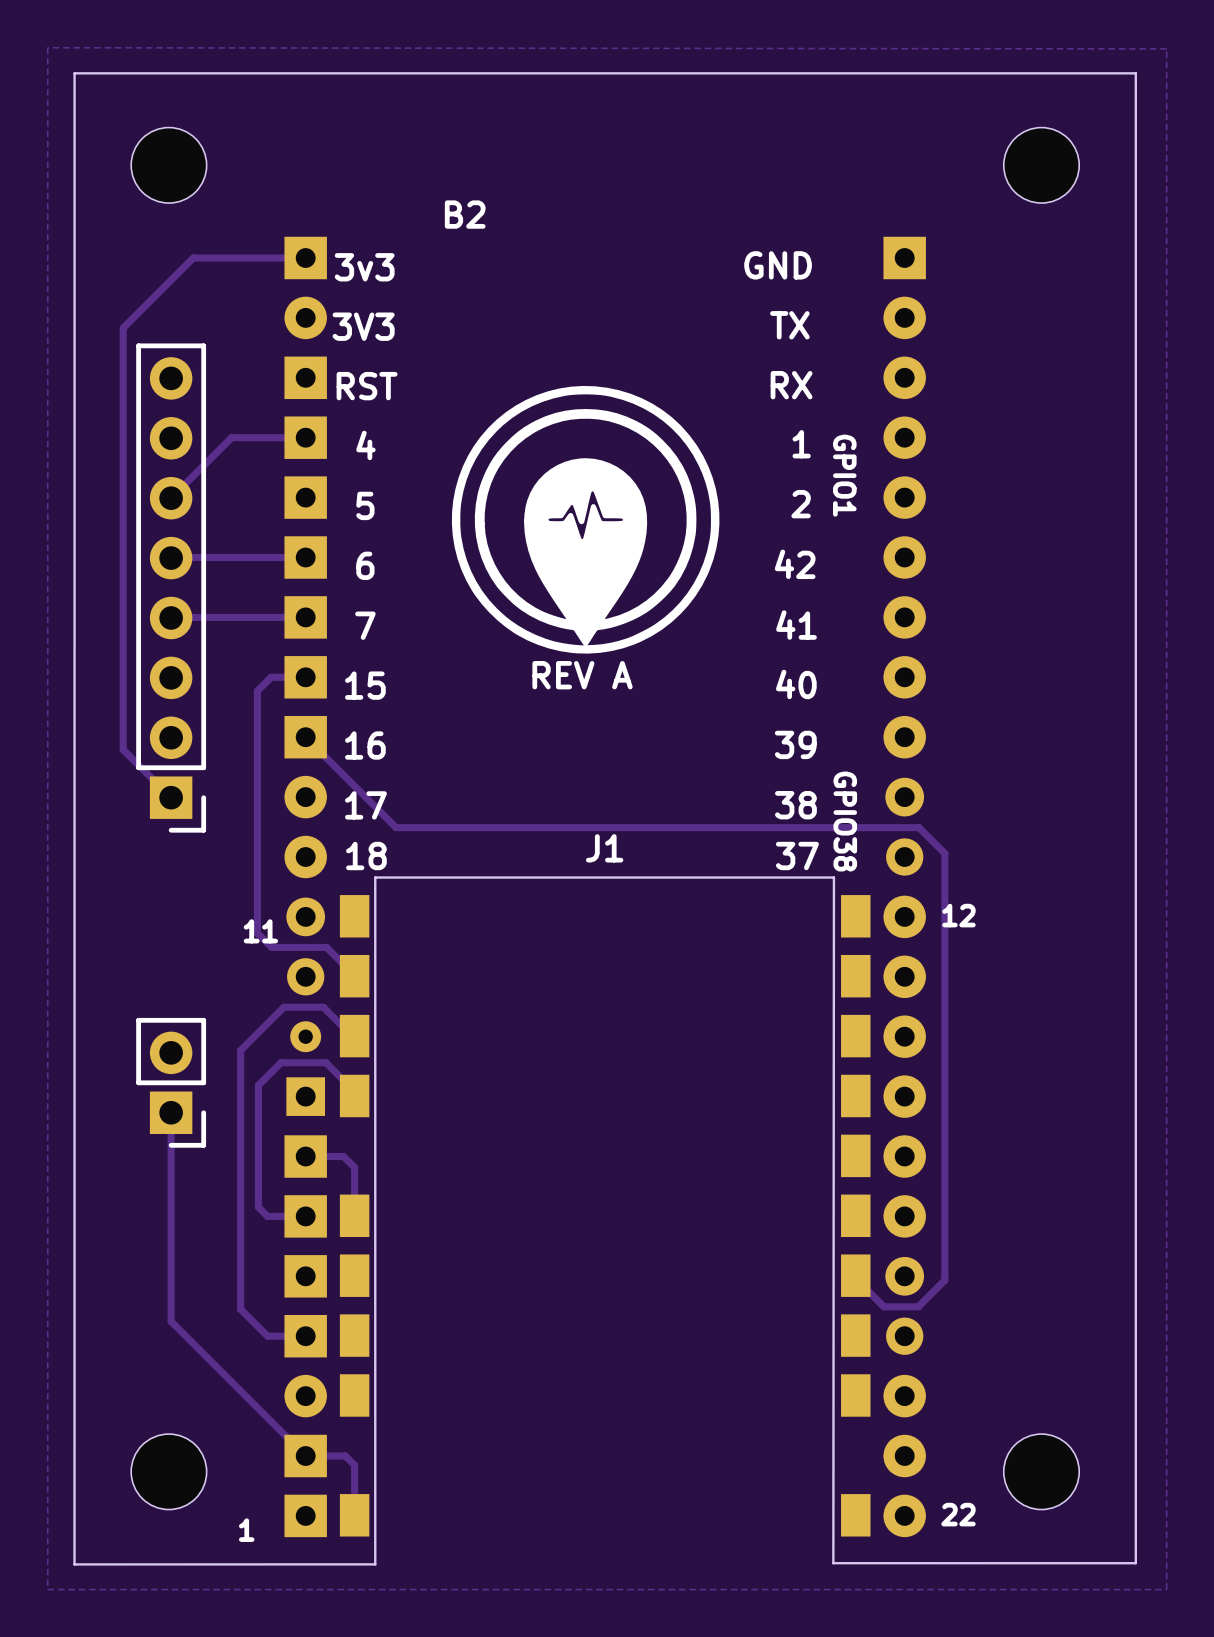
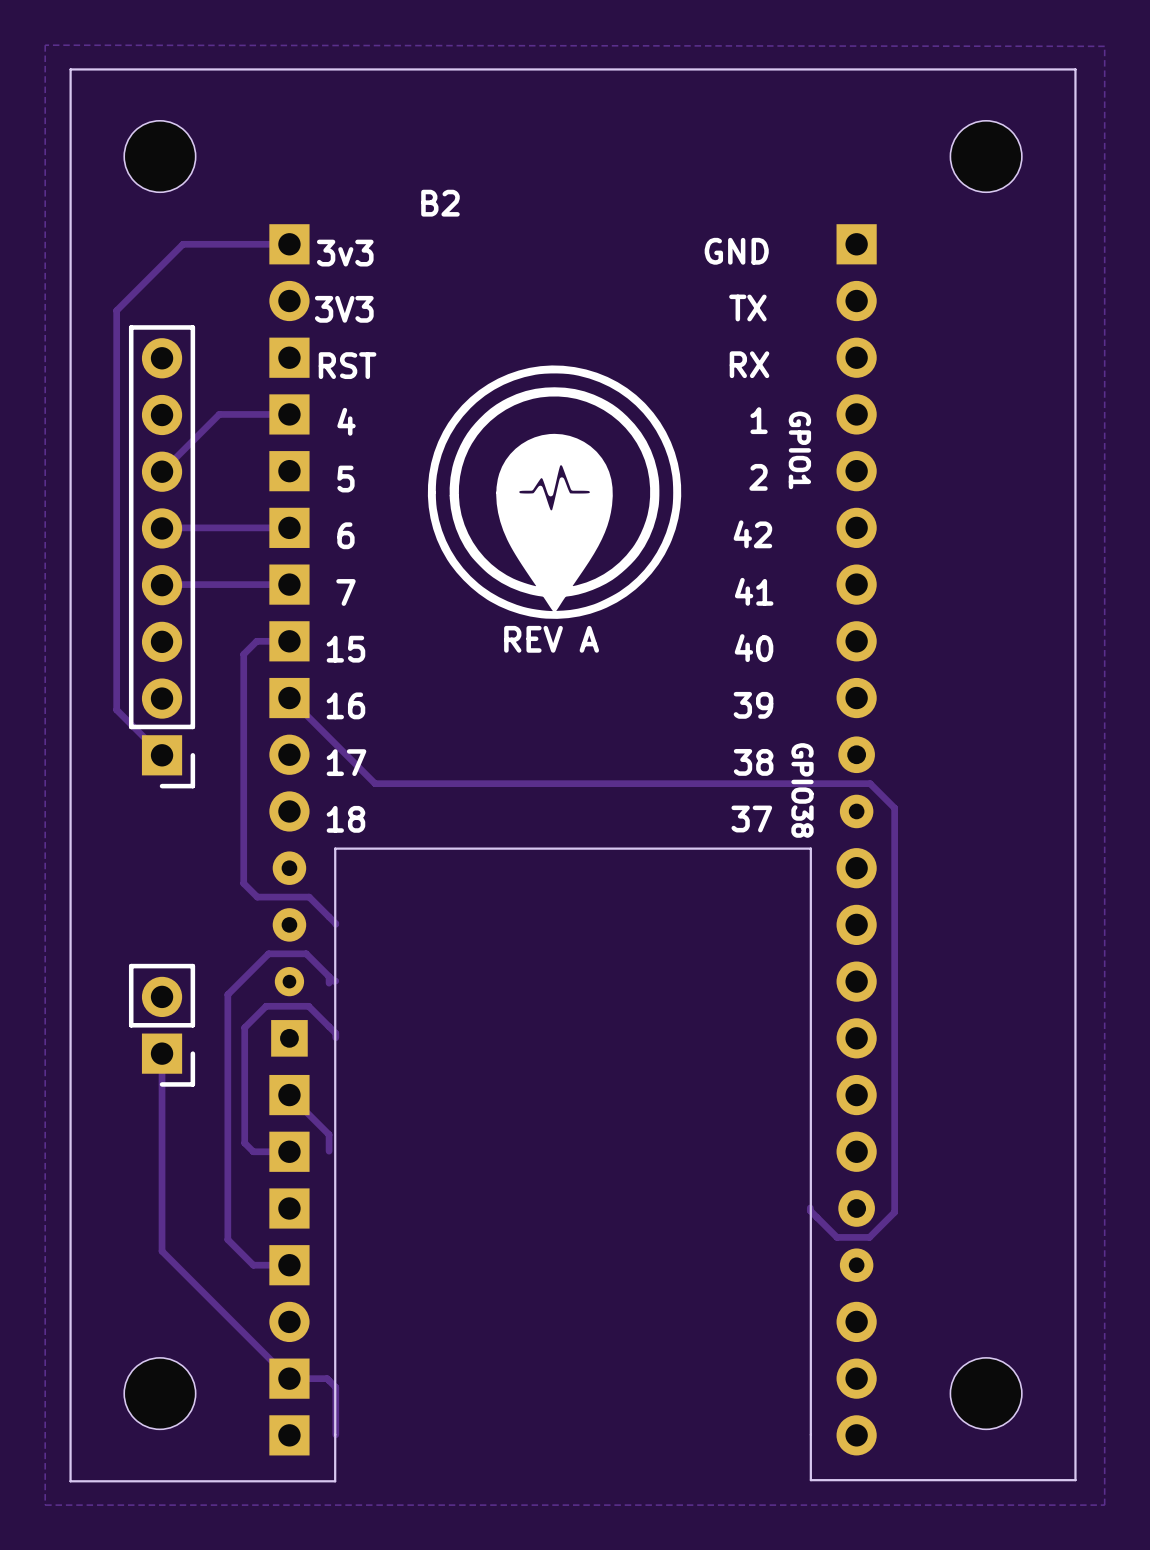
B2 footprint: [284, 236, 926, 1538] -> [269, 224, 877, 1456]
track: (305, 1156) (343, 1156) (354, 1167) (354, 1215) -> (289, 1095) (329, 1134) (329, 1151)
J1: (605, 1215) -> none
board edge: (1135, 1563) (833, 1563) (833, 877) (375, 877) (375, 1564) (74, 1564) -> (1075, 1480) (810, 1480) (810, 848) (335, 848) (335, 1481) (70, 1481)

